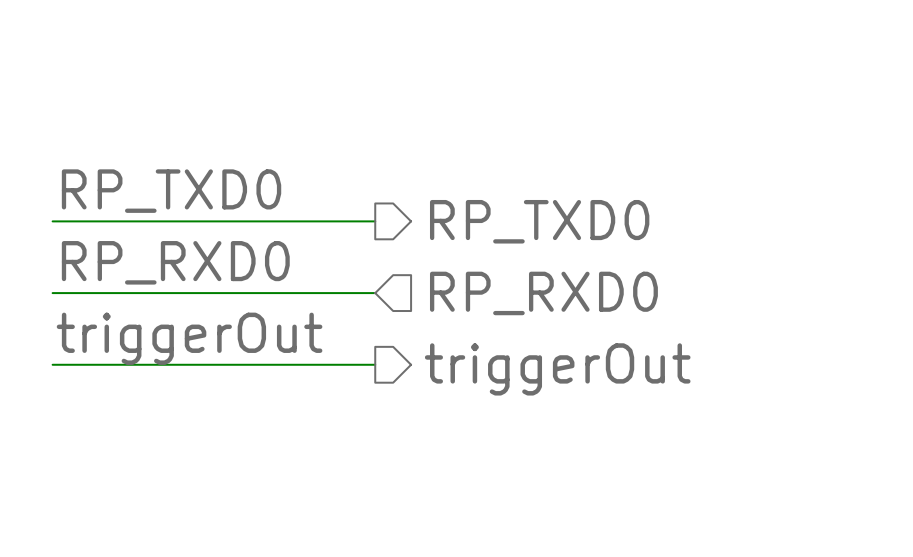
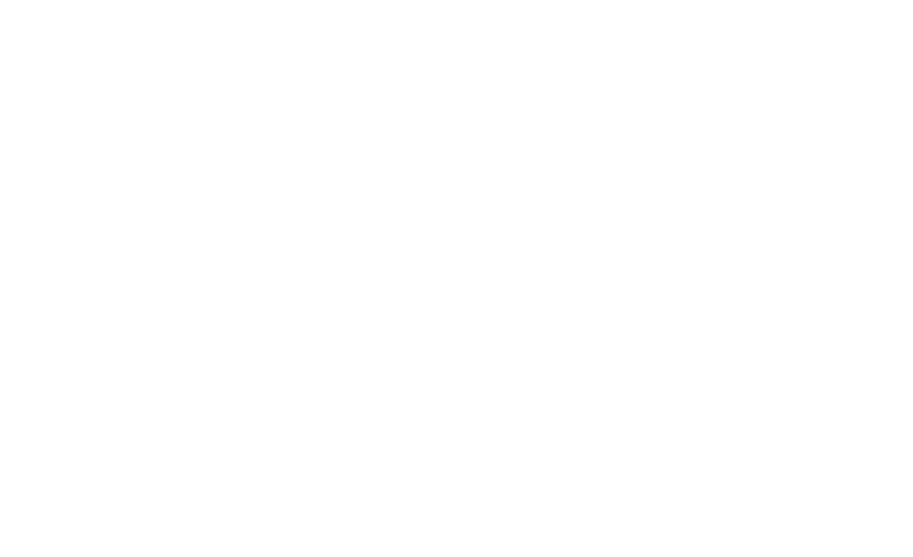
label: RP_TXD0 (171, 191) -> none
wire: (52, 221) (375, 221) -> none
hierarchical label: RP_TXD0 (539, 221) -> none
label: RP_RXD0 (175, 262) -> none
wire: (52, 293) (375, 293) -> none
hierarchical label: RP_RXD0 (543, 293) -> none
label: triggerOut (189, 338) -> none
wire: (52, 364) (375, 364) -> none
hierarchical label: triggerOut (557, 369) -> none

